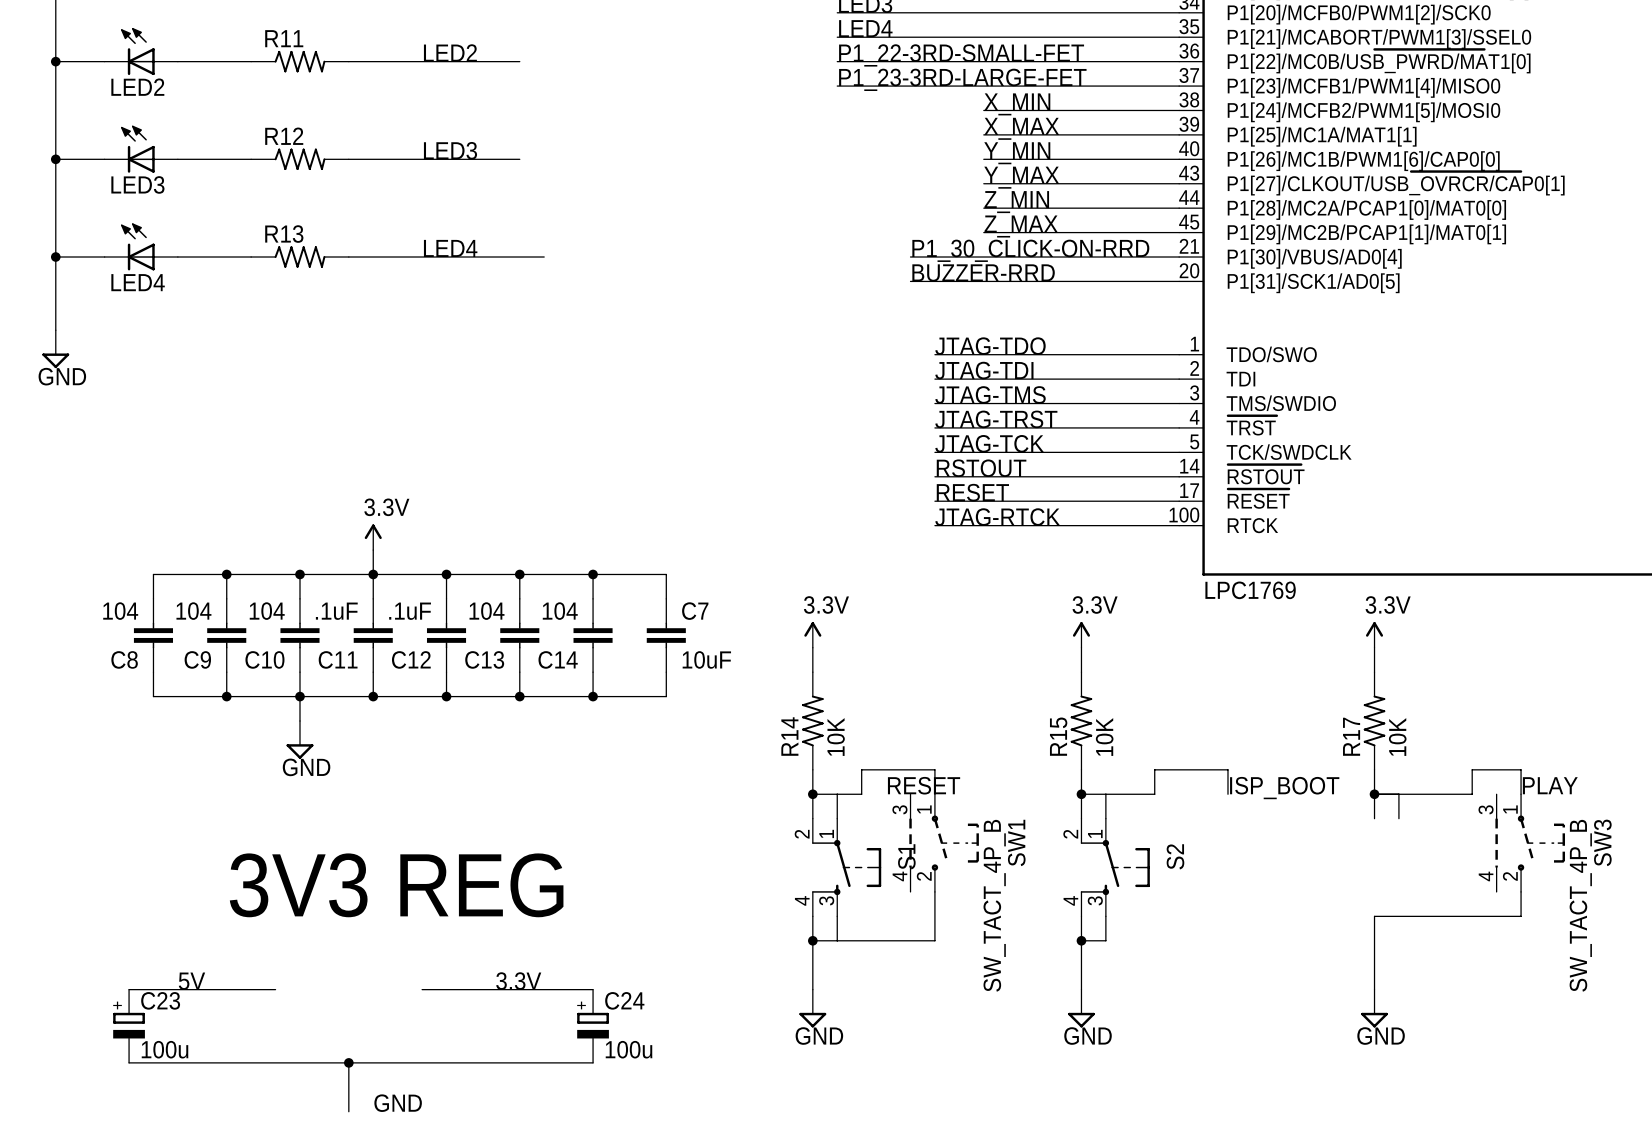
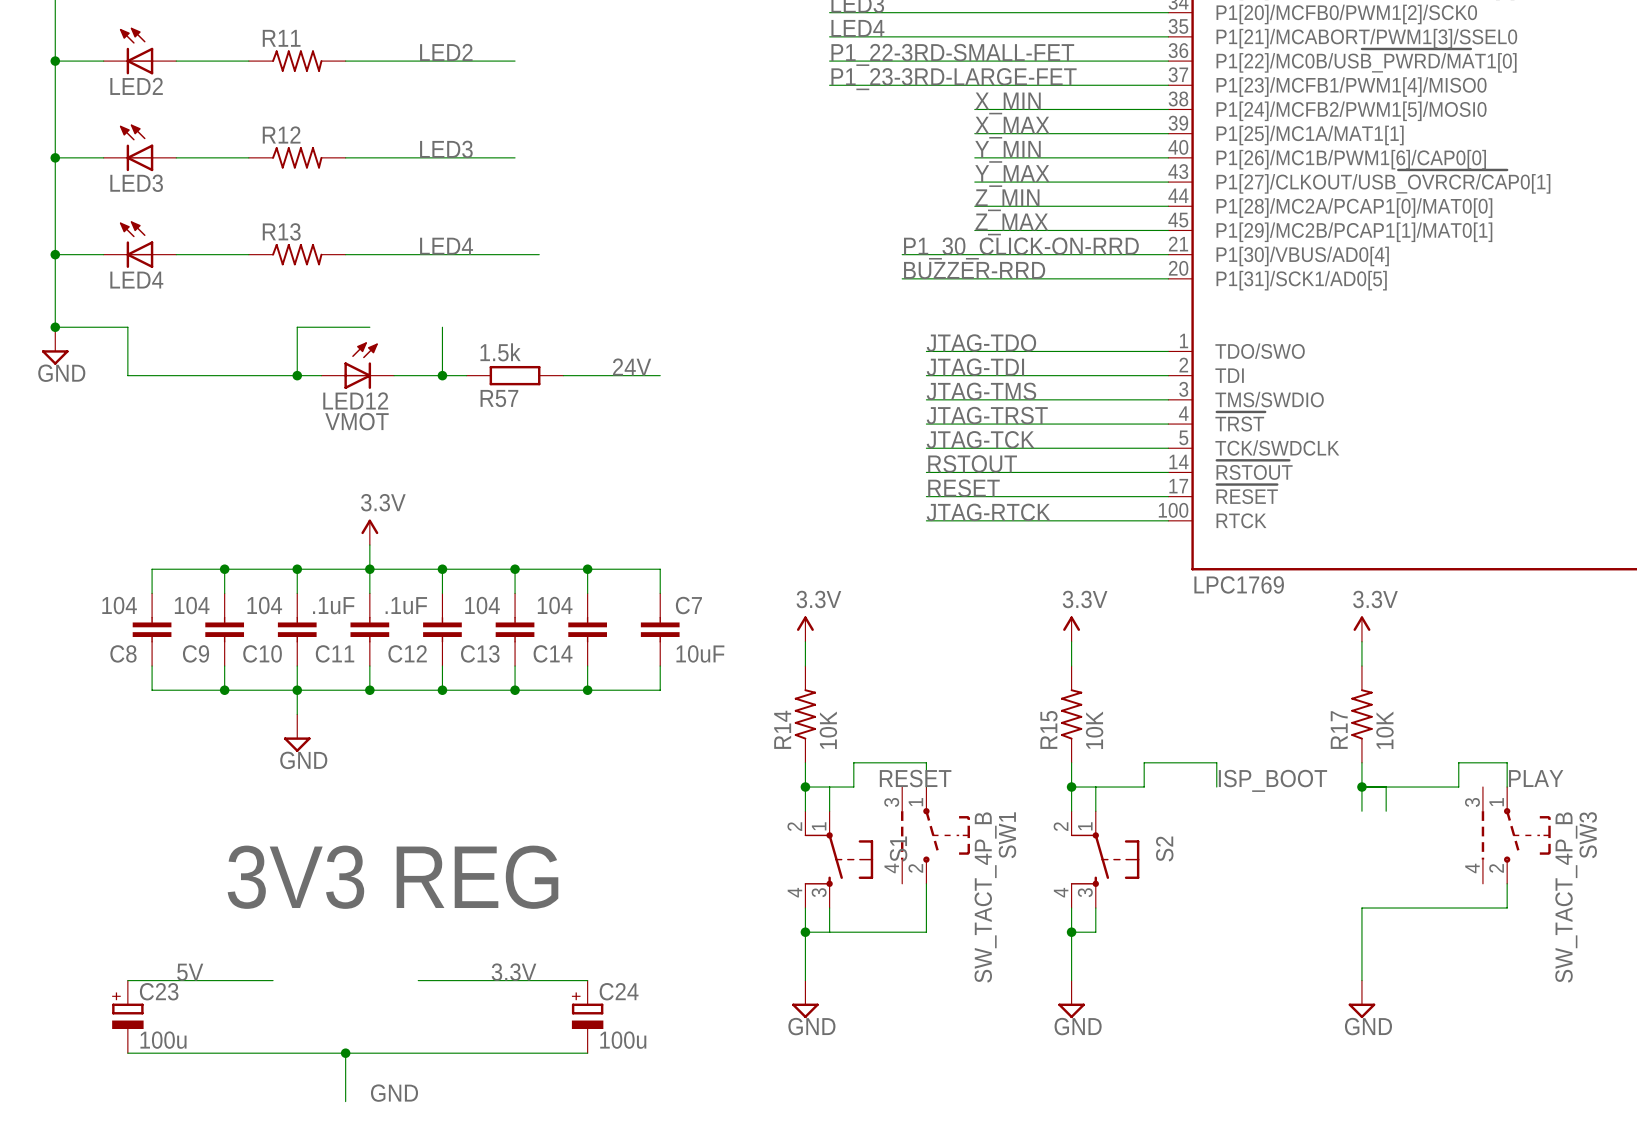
wire: none -> (55, 327) (127, 327) (127, 375) (321, 375)
junction: none -> (55, 327)
wire: none -> (369, 327) (297, 327) (297, 375)
wire: none -> (442, 327) (442, 375)
LED12: none -> VMOT (357, 365)
label: none -> 24V (632, 367)
junction: none -> (297, 375)
wire: none -> (394, 375) (466, 375)
junction: none -> (442, 375)
R57: none -> 1.5k (515, 375)
wire: none -> (563, 375) (660, 375)

